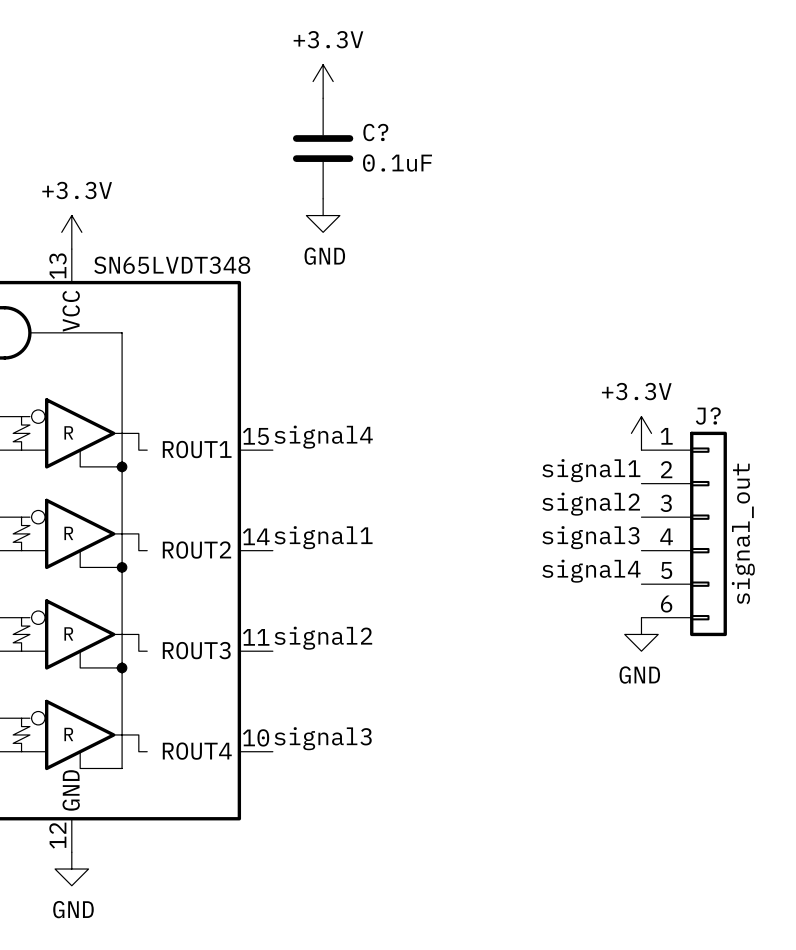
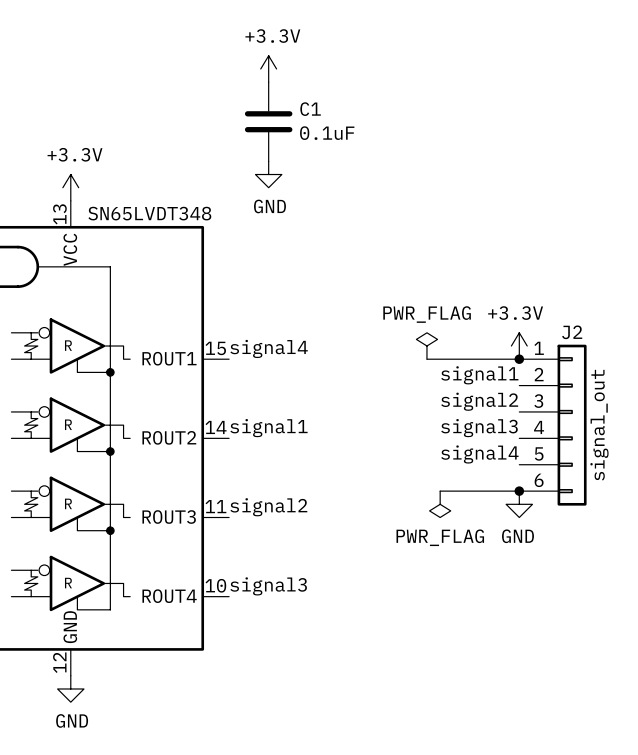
C? name: C? (375, 132) -> C1 (310, 109)
J? name: J? (708, 416) -> J2 (572, 332)
power symbol: none -> PWR_FLAG (426, 346)
wire: none -> (426, 359) (519, 359)
junction: none -> (519, 359)
wire: none -> (440, 491) (519, 491)
junction: none -> (519, 491)
power symbol: none -> PWR_FLAG (440, 504)

